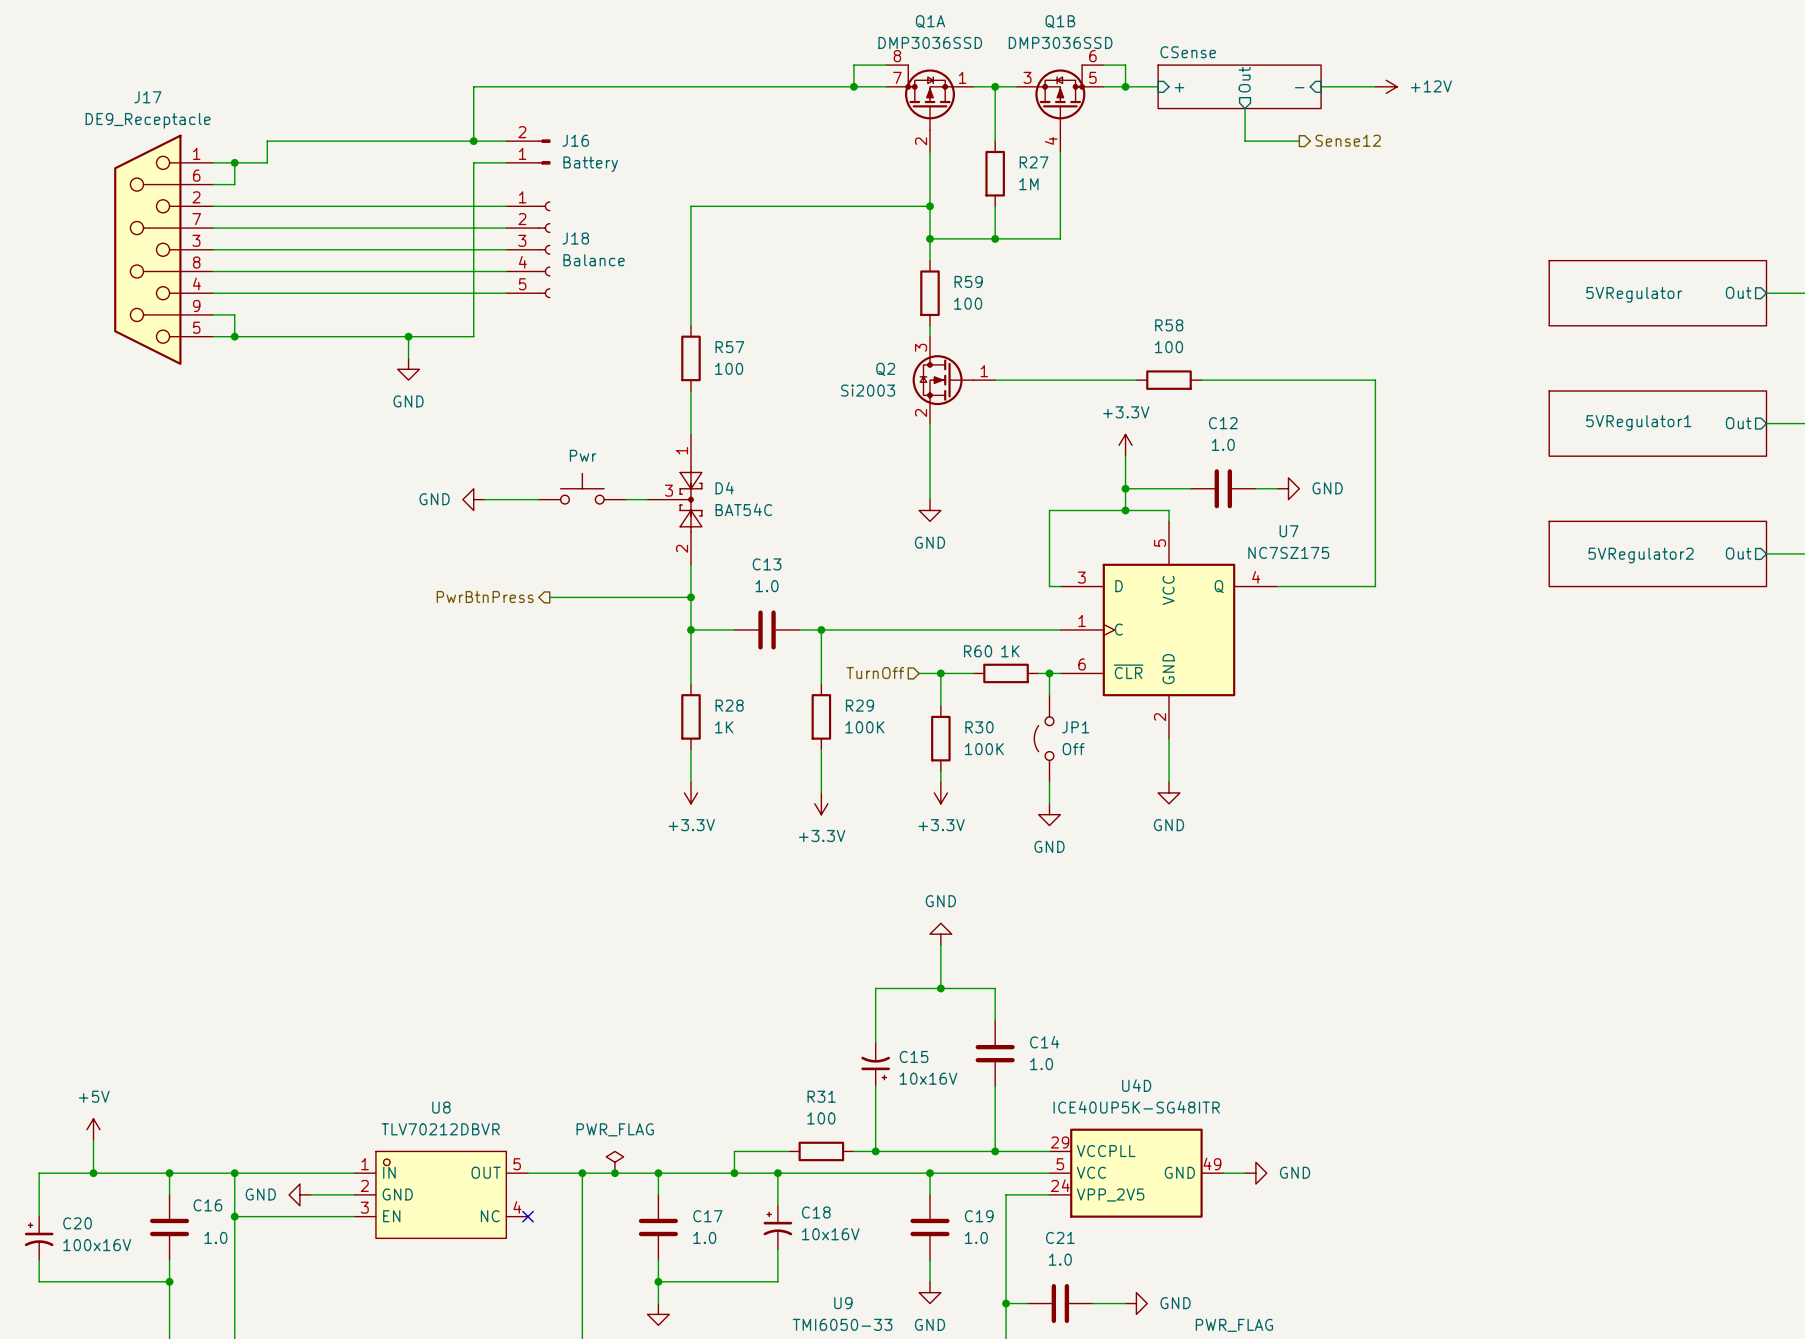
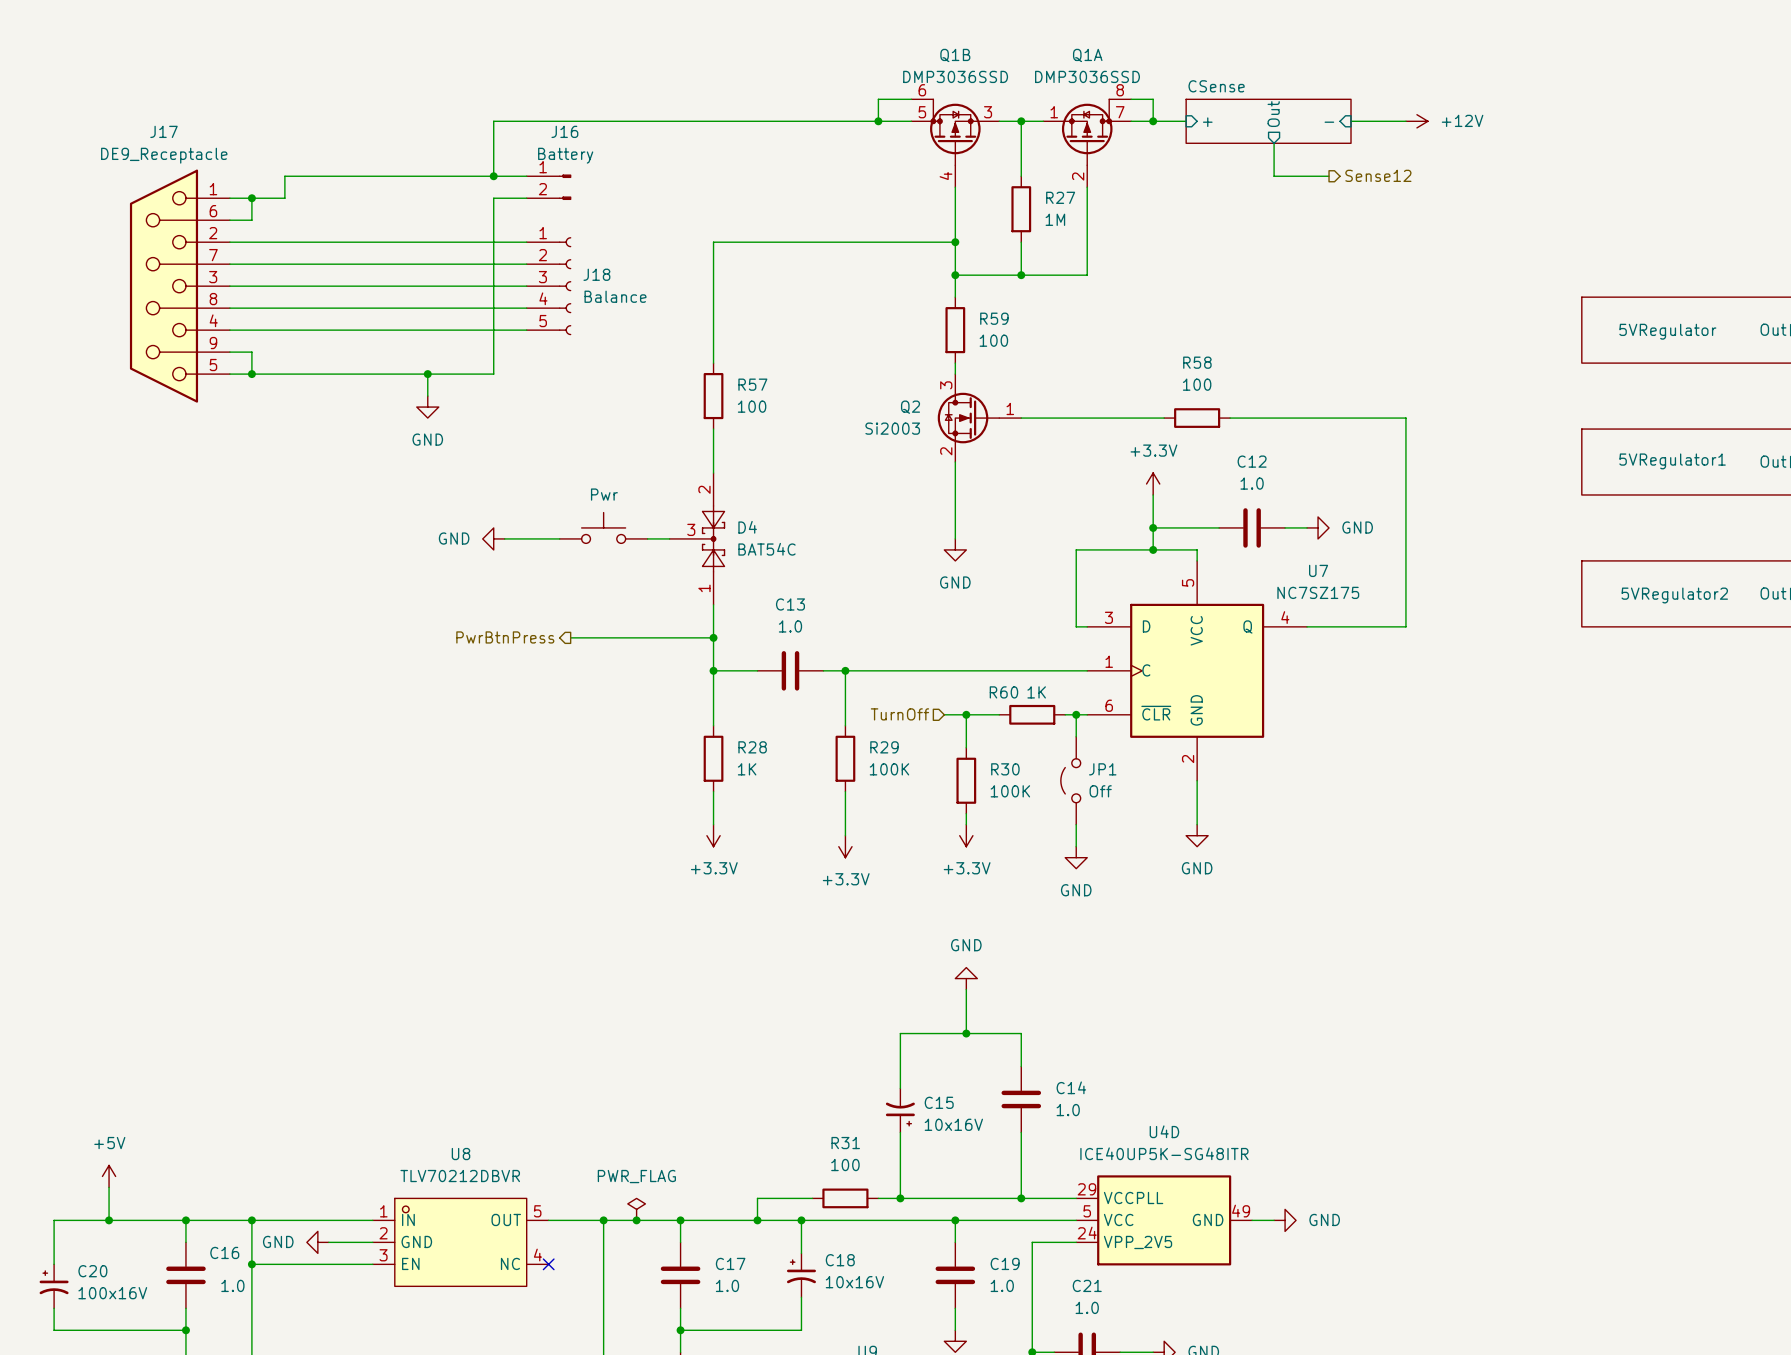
Q1A flip: as is (930, 97) -> left-right (1087, 132)
Q1B flip: as is (1060, 97) -> left-right (955, 132)
Q1A position: (930, 108) -> (1087, 143)
Q1B position: (1060, 108) -> (955, 143)
J16 name position: J16 (575, 140) -> J16 (564, 131)
J16 flip: as is (544, 151) -> up-down (565, 187)
J16 value position: Battery (590, 164) -> Battery (565, 155)
D4 flip: as is (691, 499) -> up-down (713, 538)

